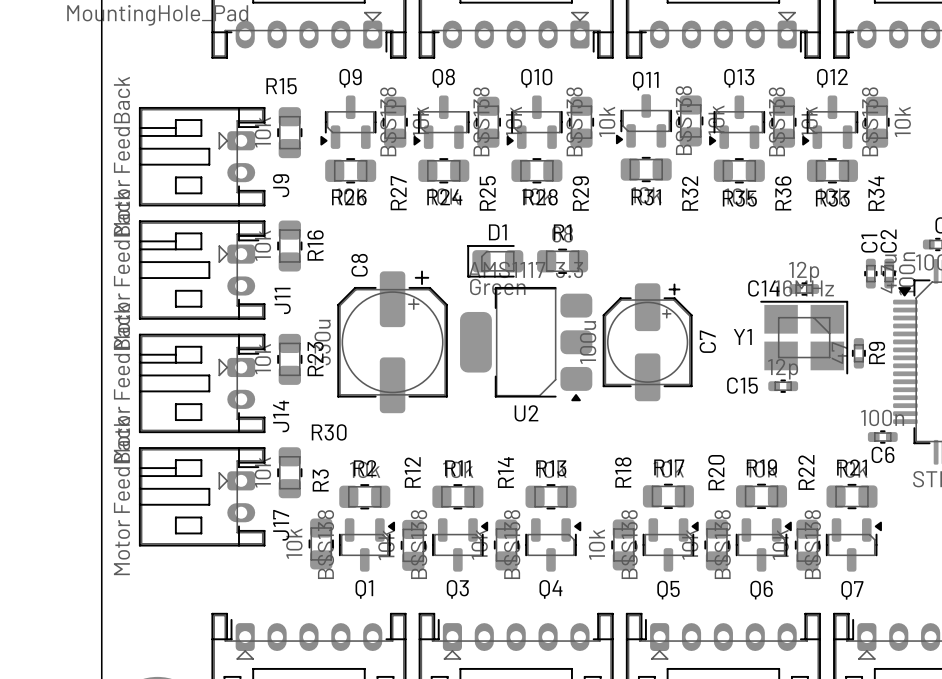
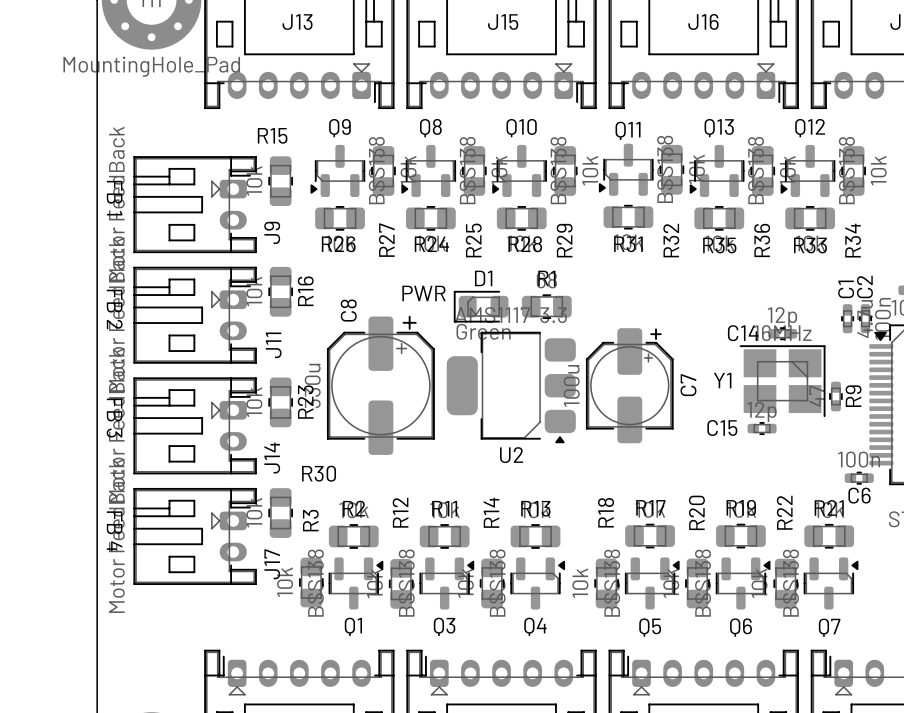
text: none -> FB 1 (114, 198)
text: none -> PWR (424, 293)
text: none -> FB 2 (114, 309)
text: none -> FB 3 (114, 418)
text: none -> FB 4 (114, 531)

